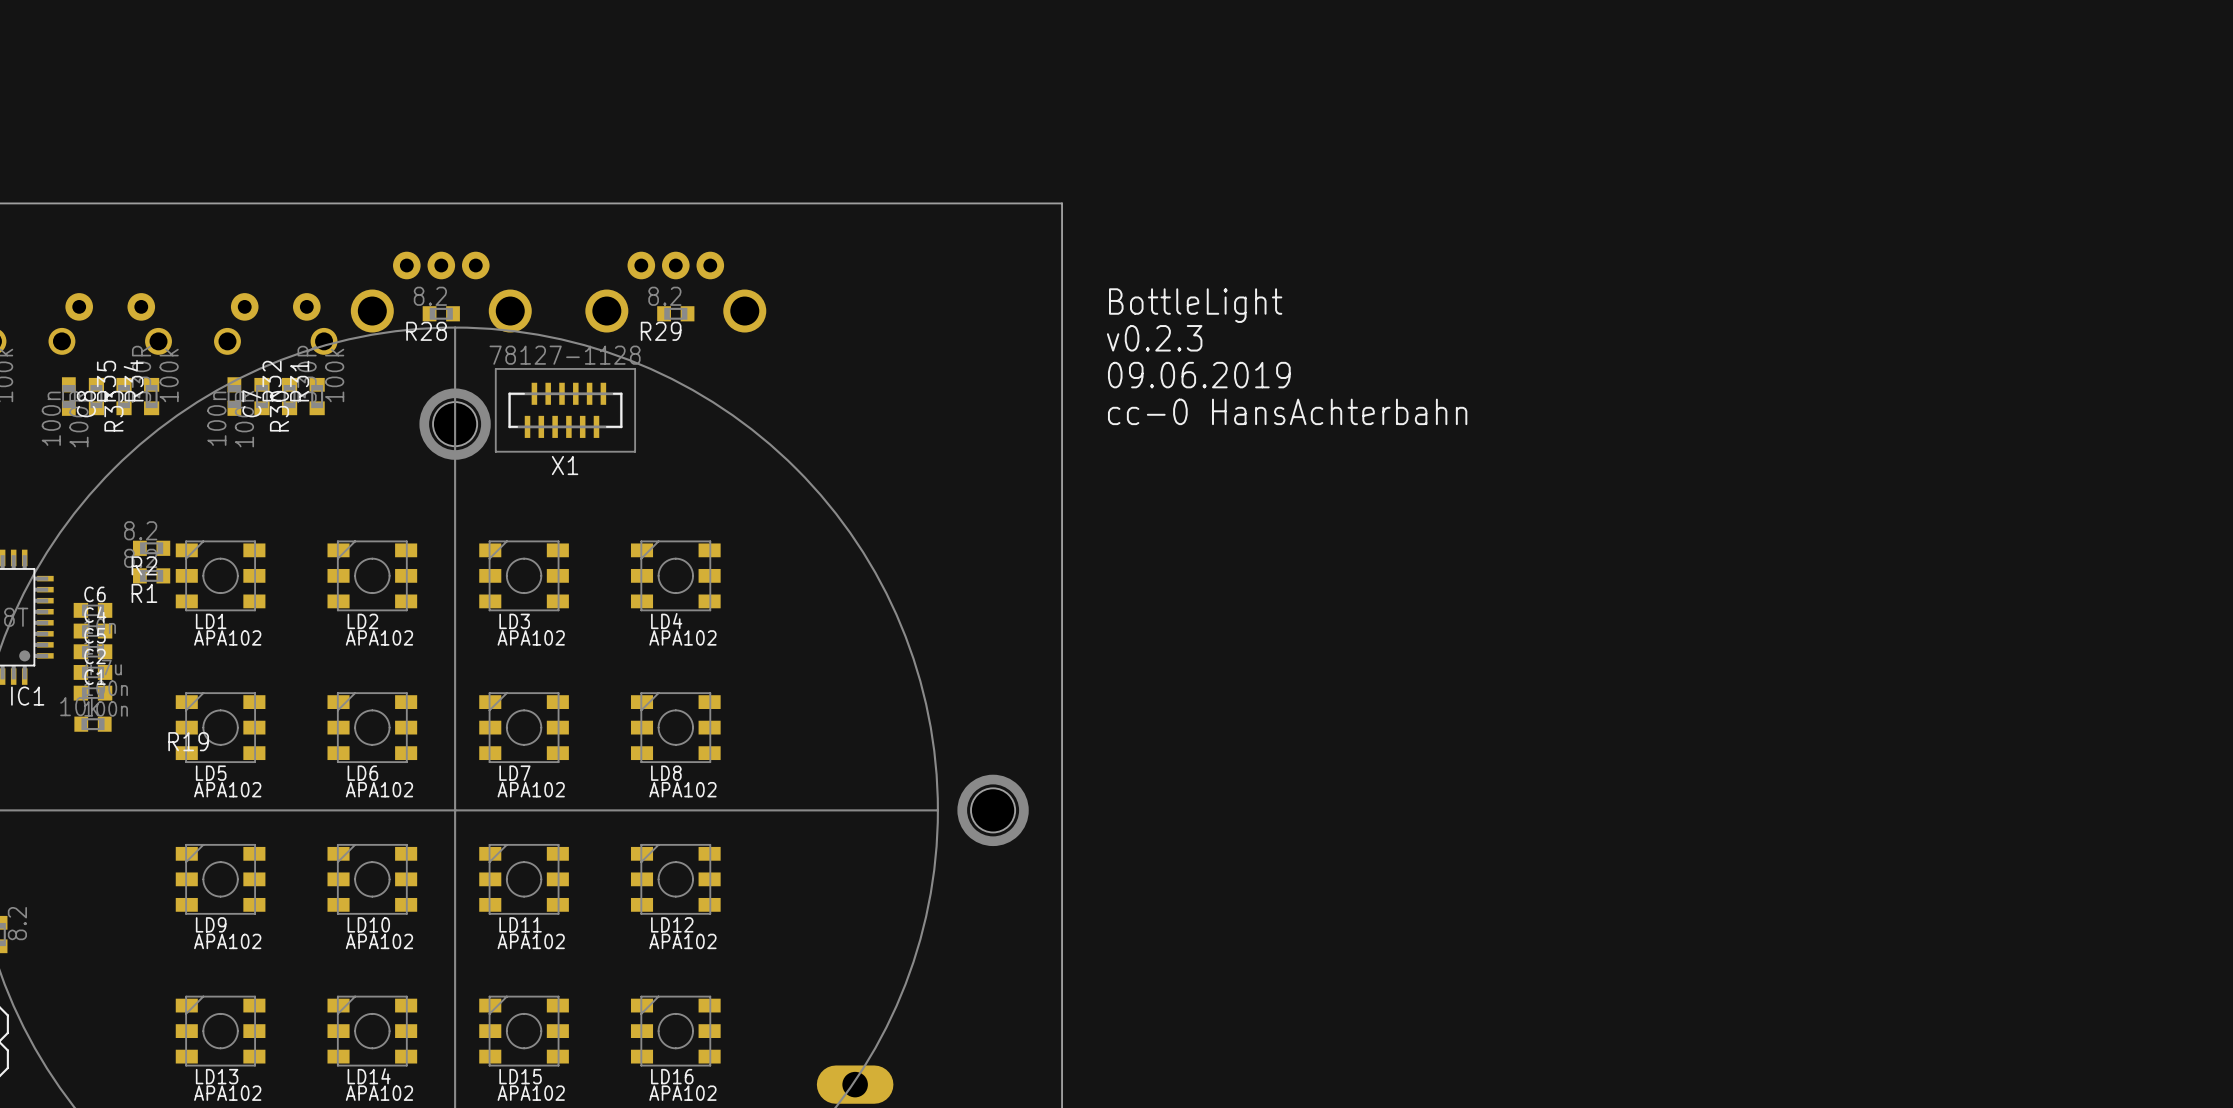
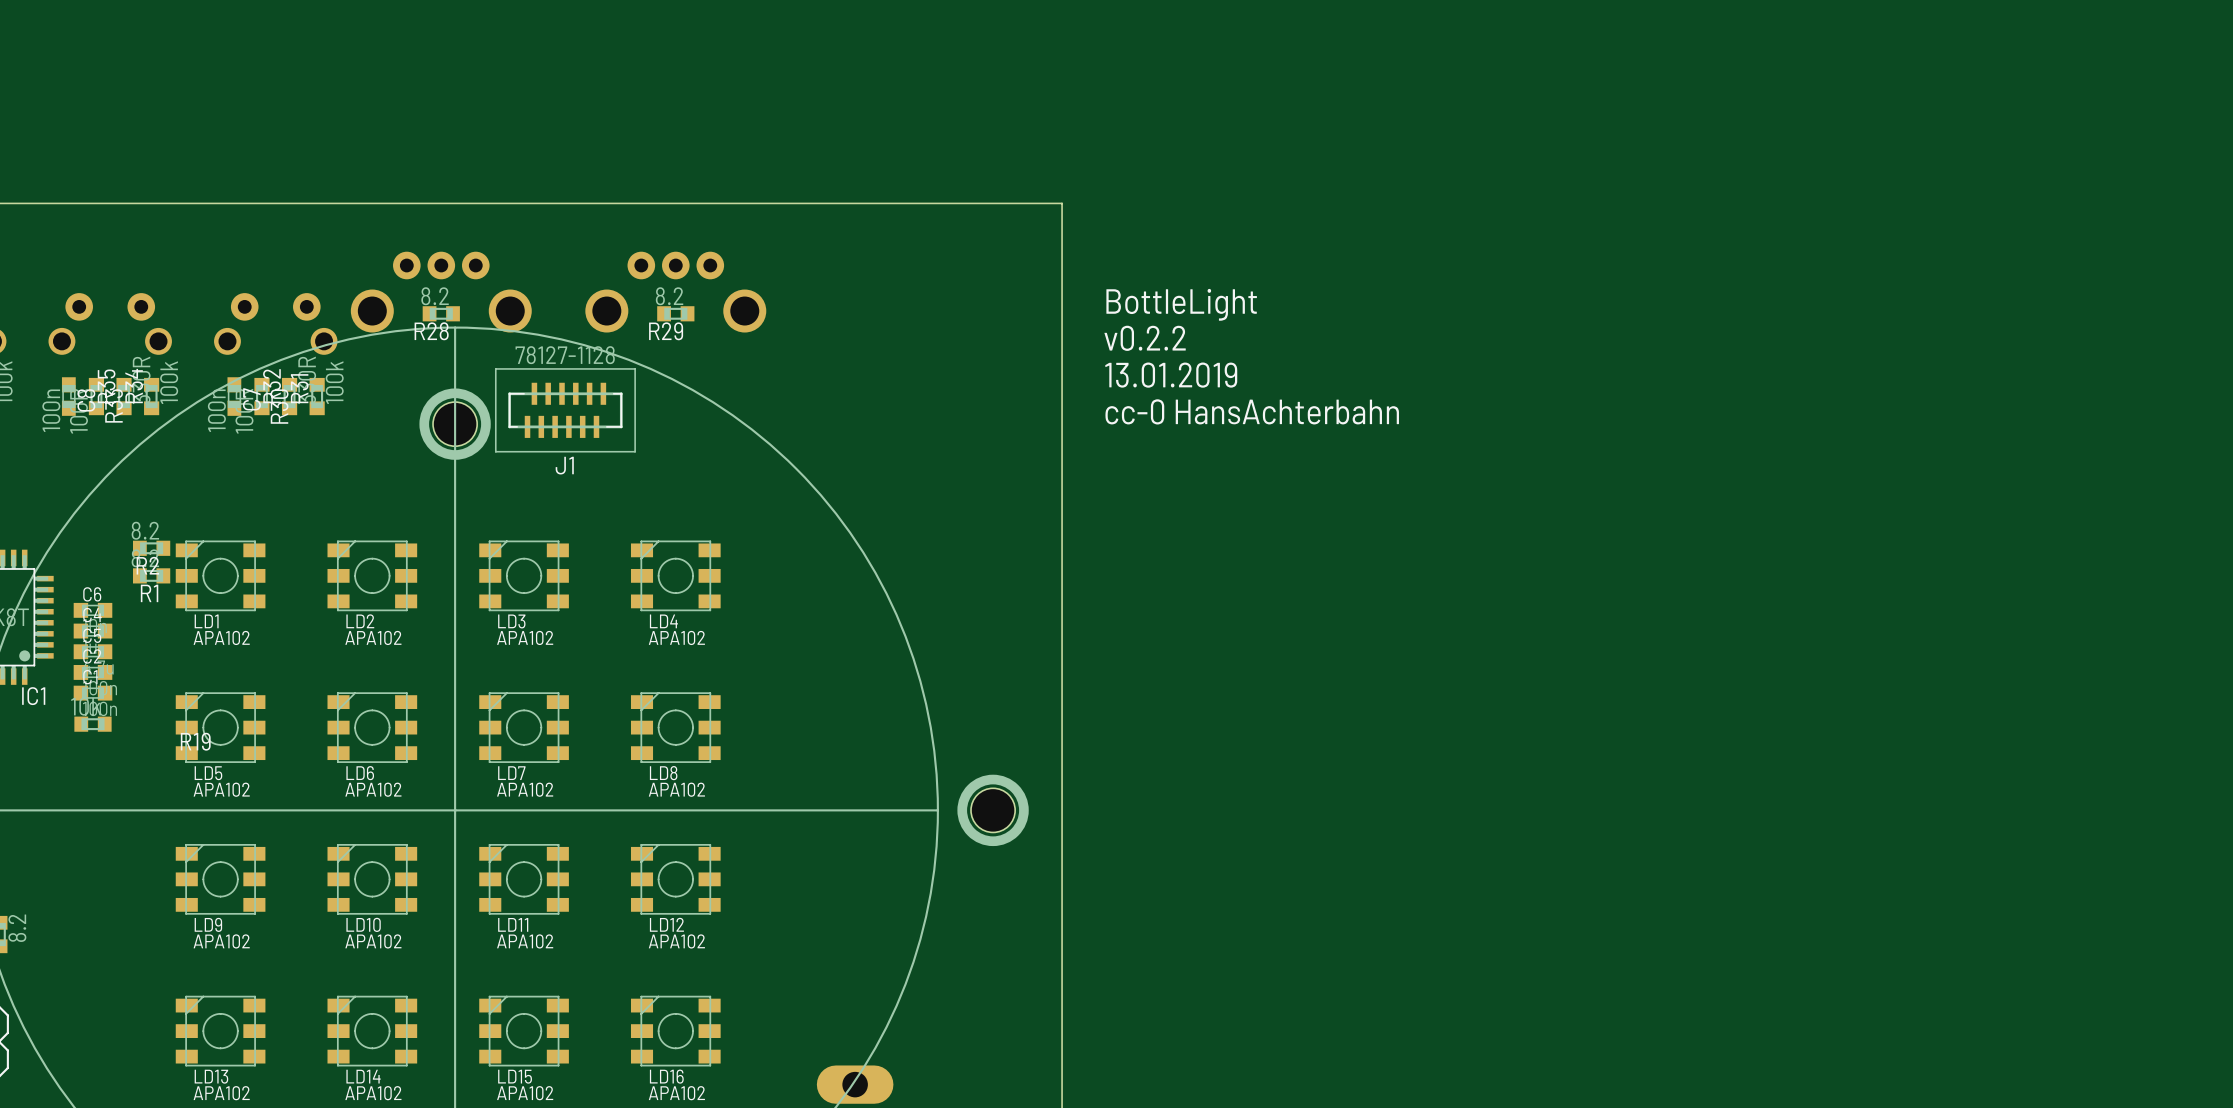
text: v0.2.3 (1154, 338) -> v0.2.2 (1145, 338)
text: 09.06.2019 (1199, 375) -> 13.01.2019 (1171, 375)
X1 name: X1 (565, 465) -> J1 (564, 465)

